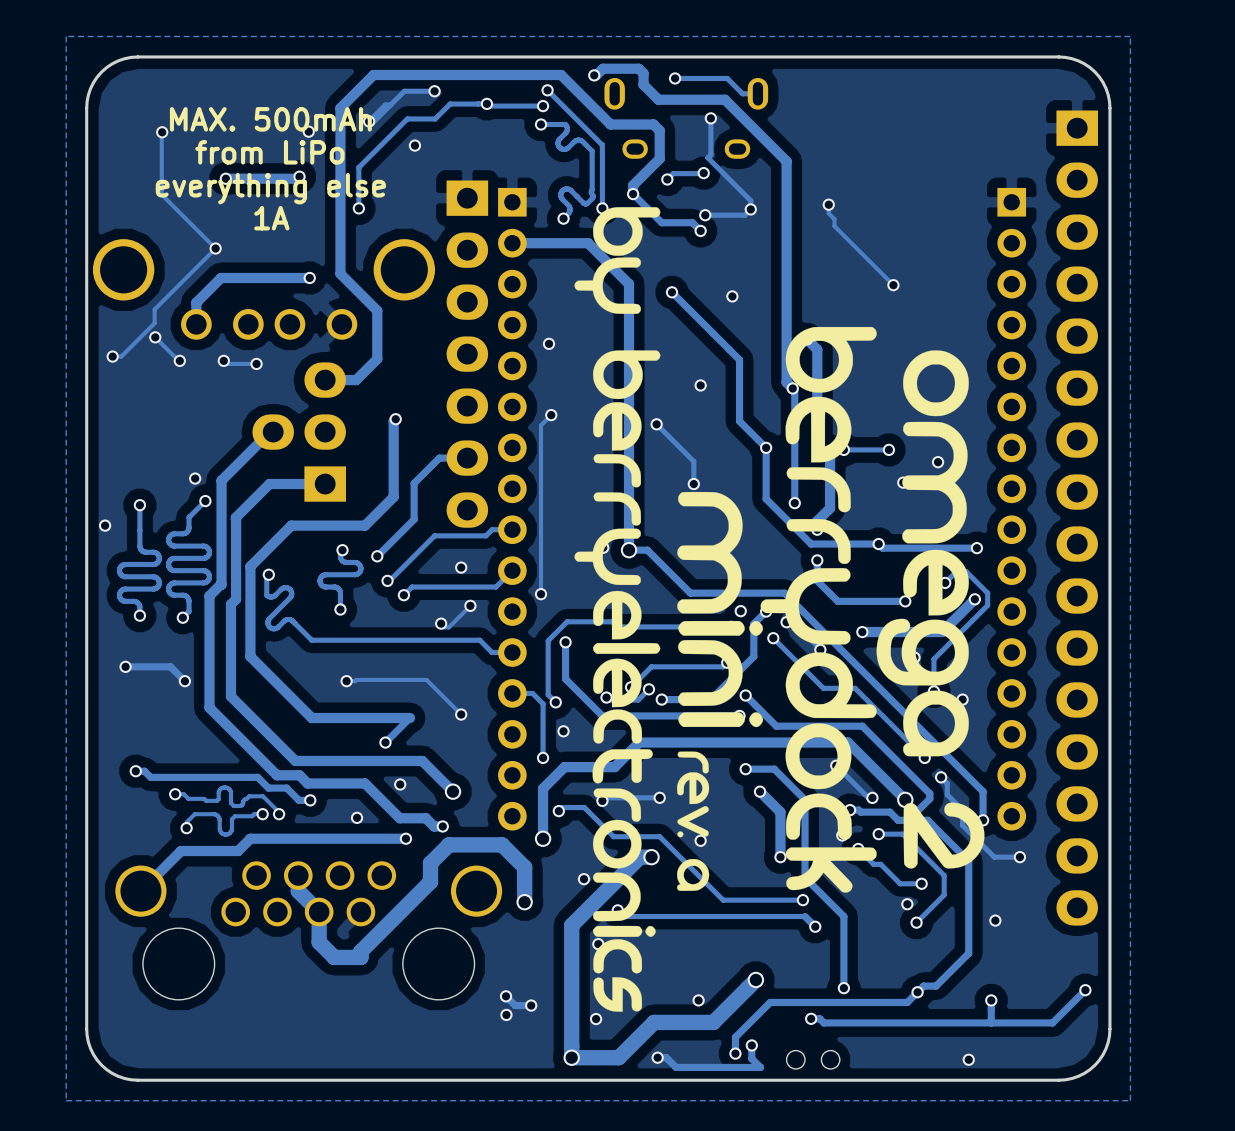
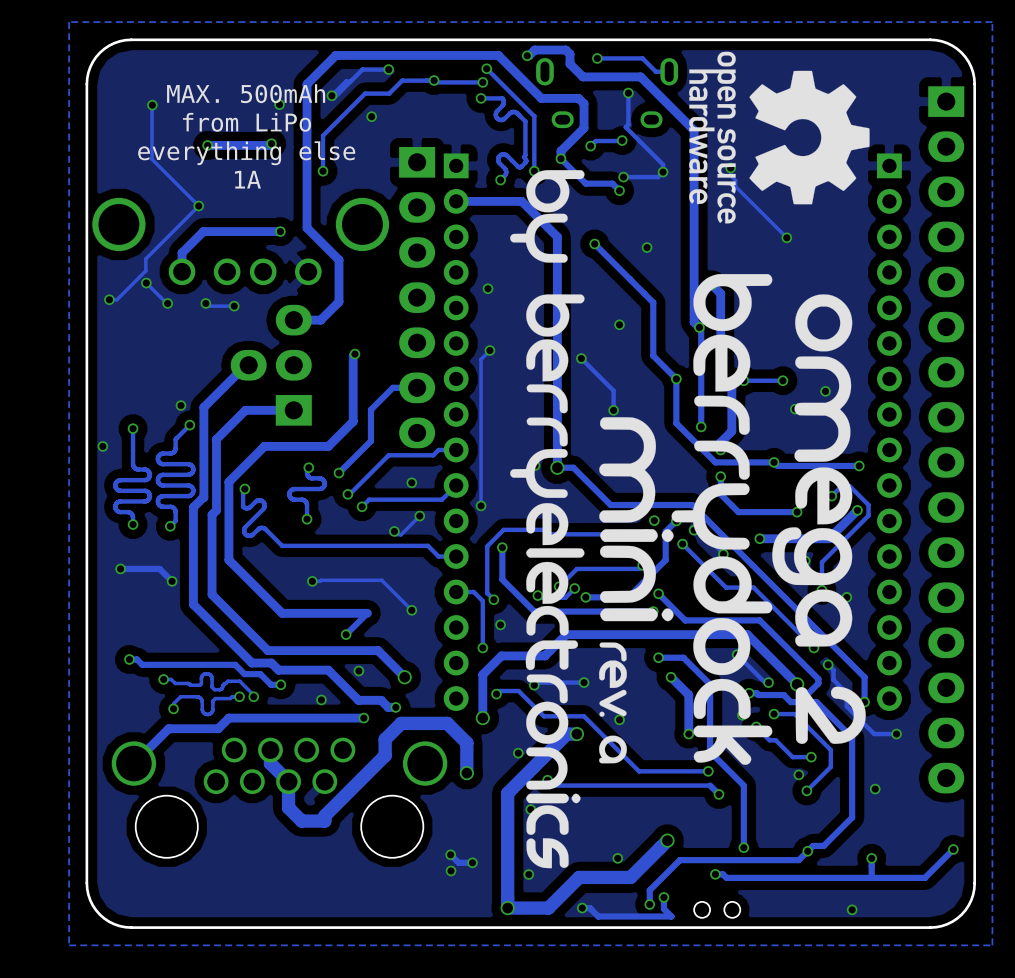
drawing: none -> [689, 51, 870, 224]

